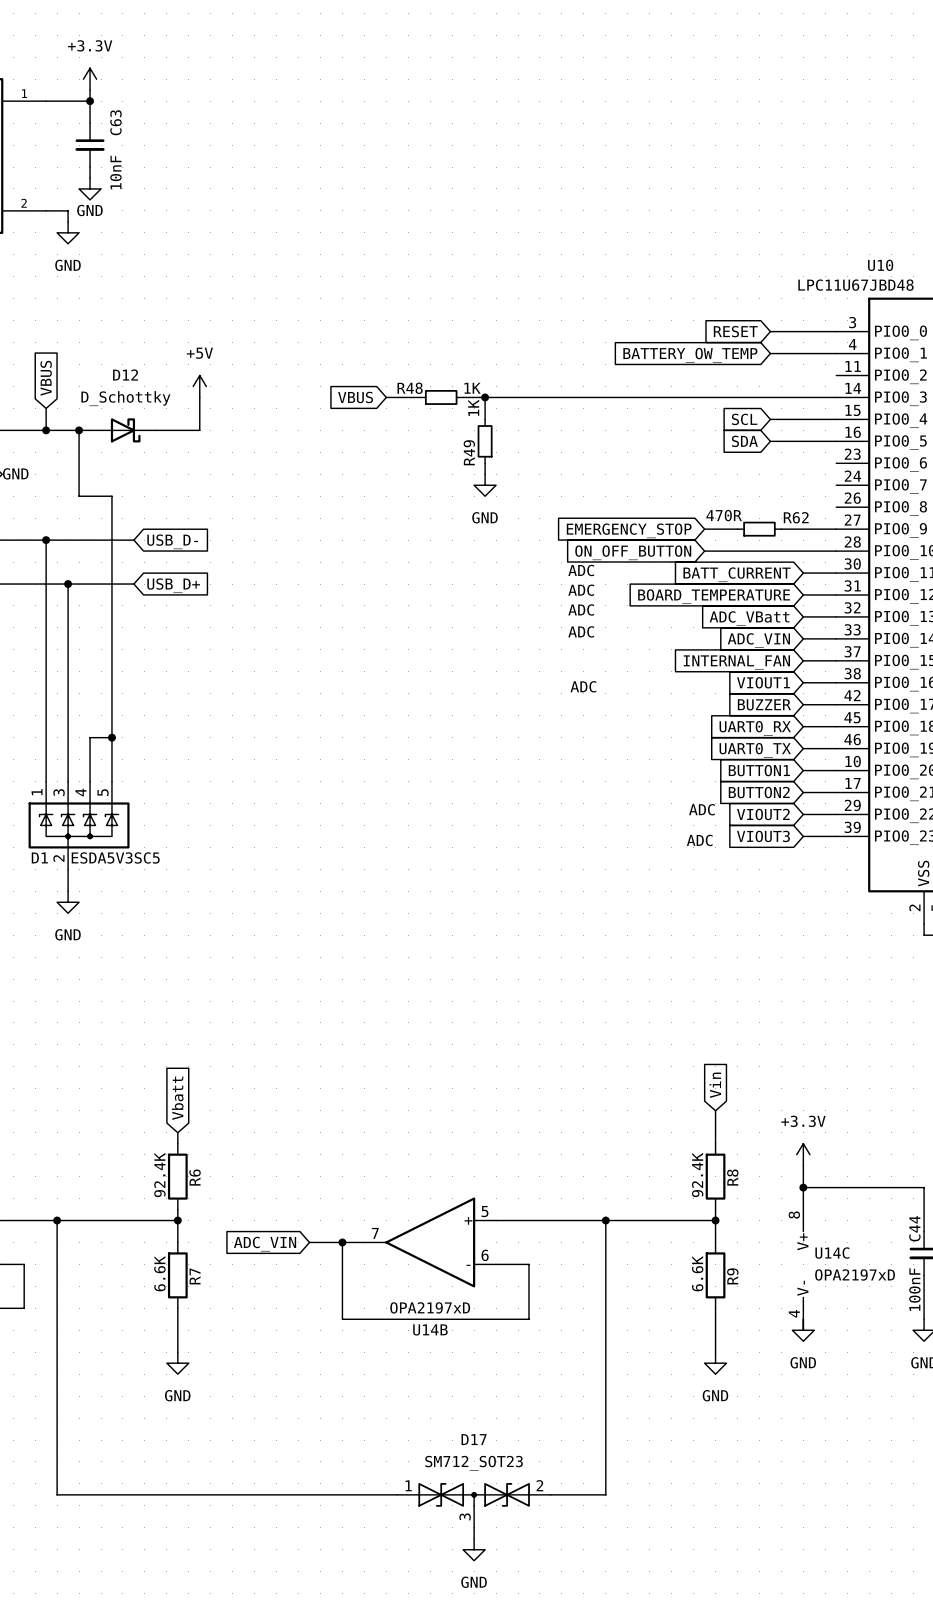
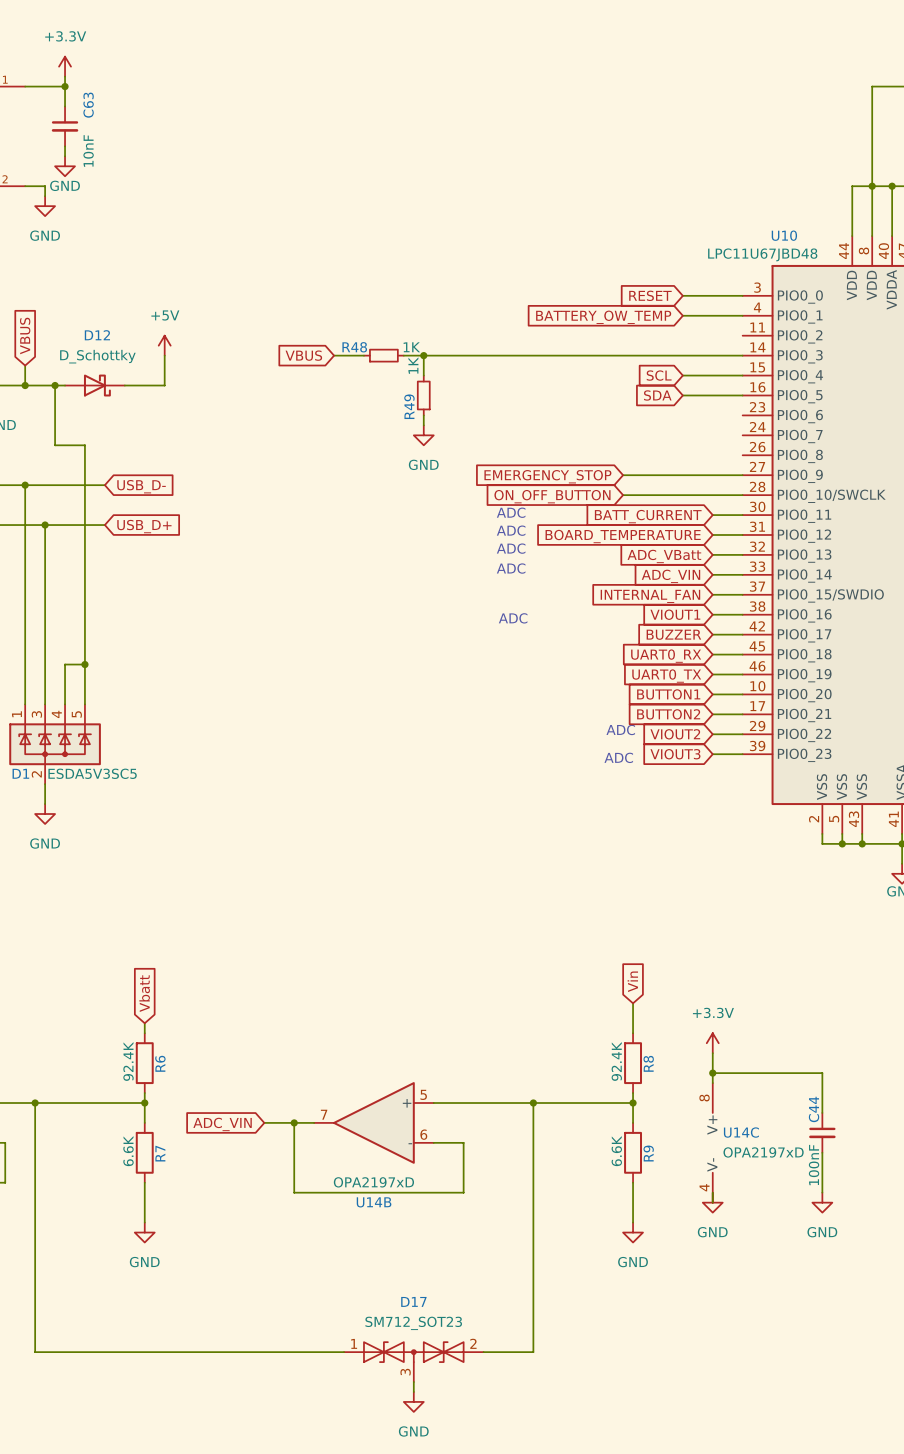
wire: none -> (652, 475) (692, 475)
R62: 470R (759, 529) -> none

